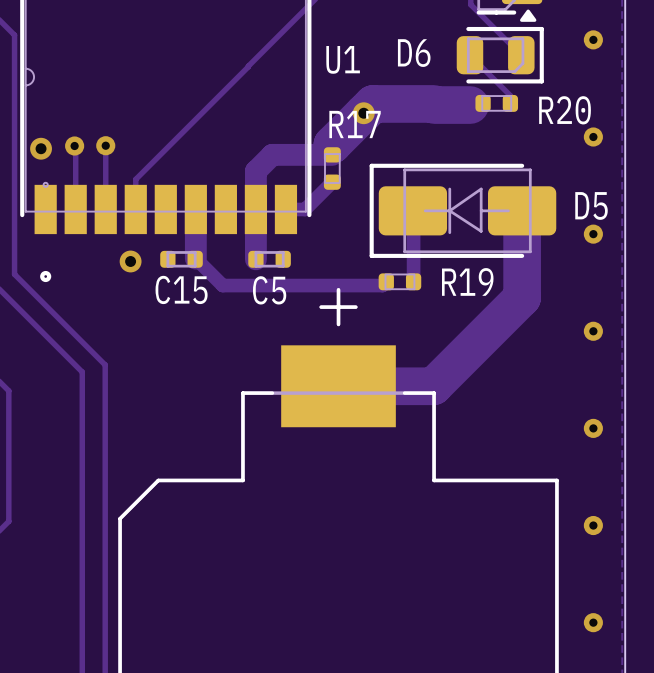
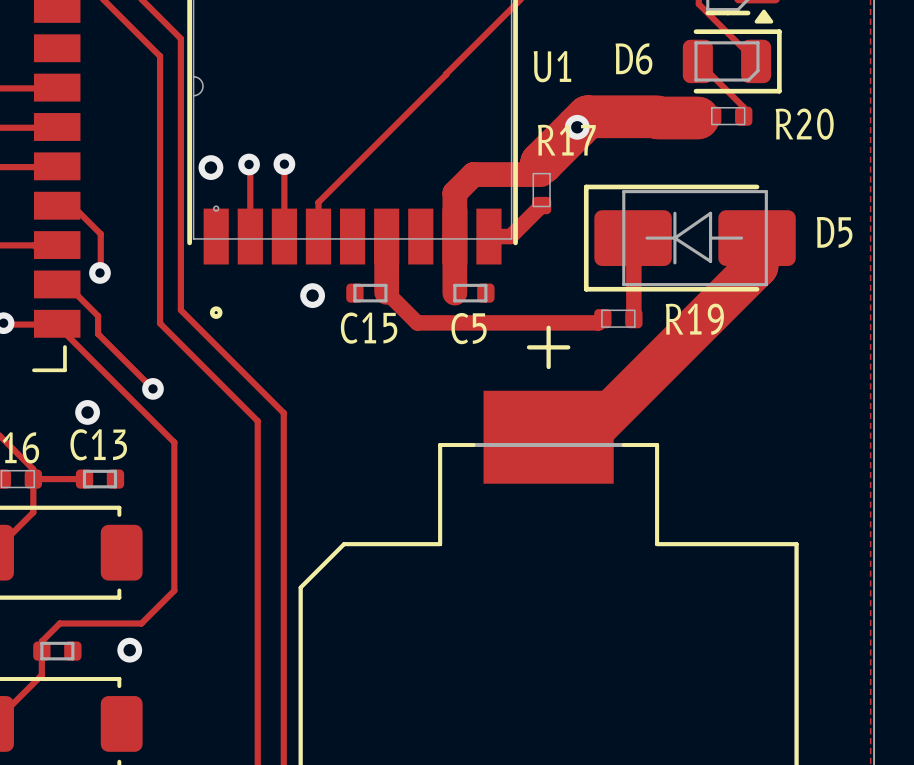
via: (593, 39) -> none
via: (593, 137) -> none
via: (593, 234) -> none
track: (522, 235) (522, 297) (433, 386) (371, 386) -> (757, 265) (585, 437)
via: (593, 331) -> none
via: (593, 428) -> none
via: (593, 525) -> none
via: (593, 622) -> none

